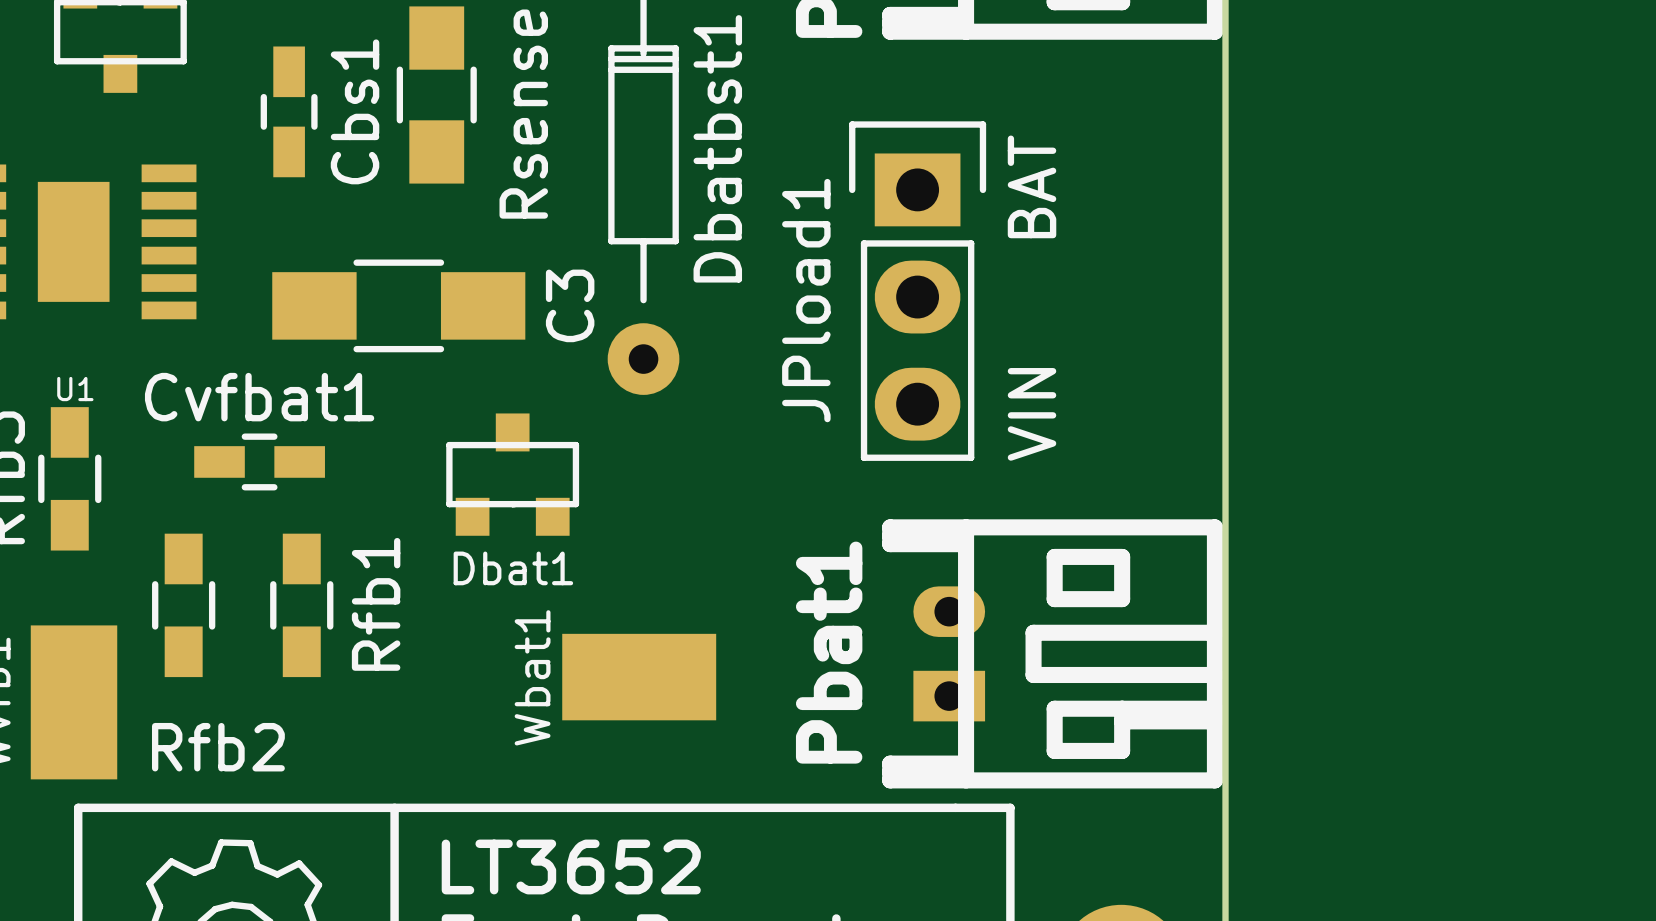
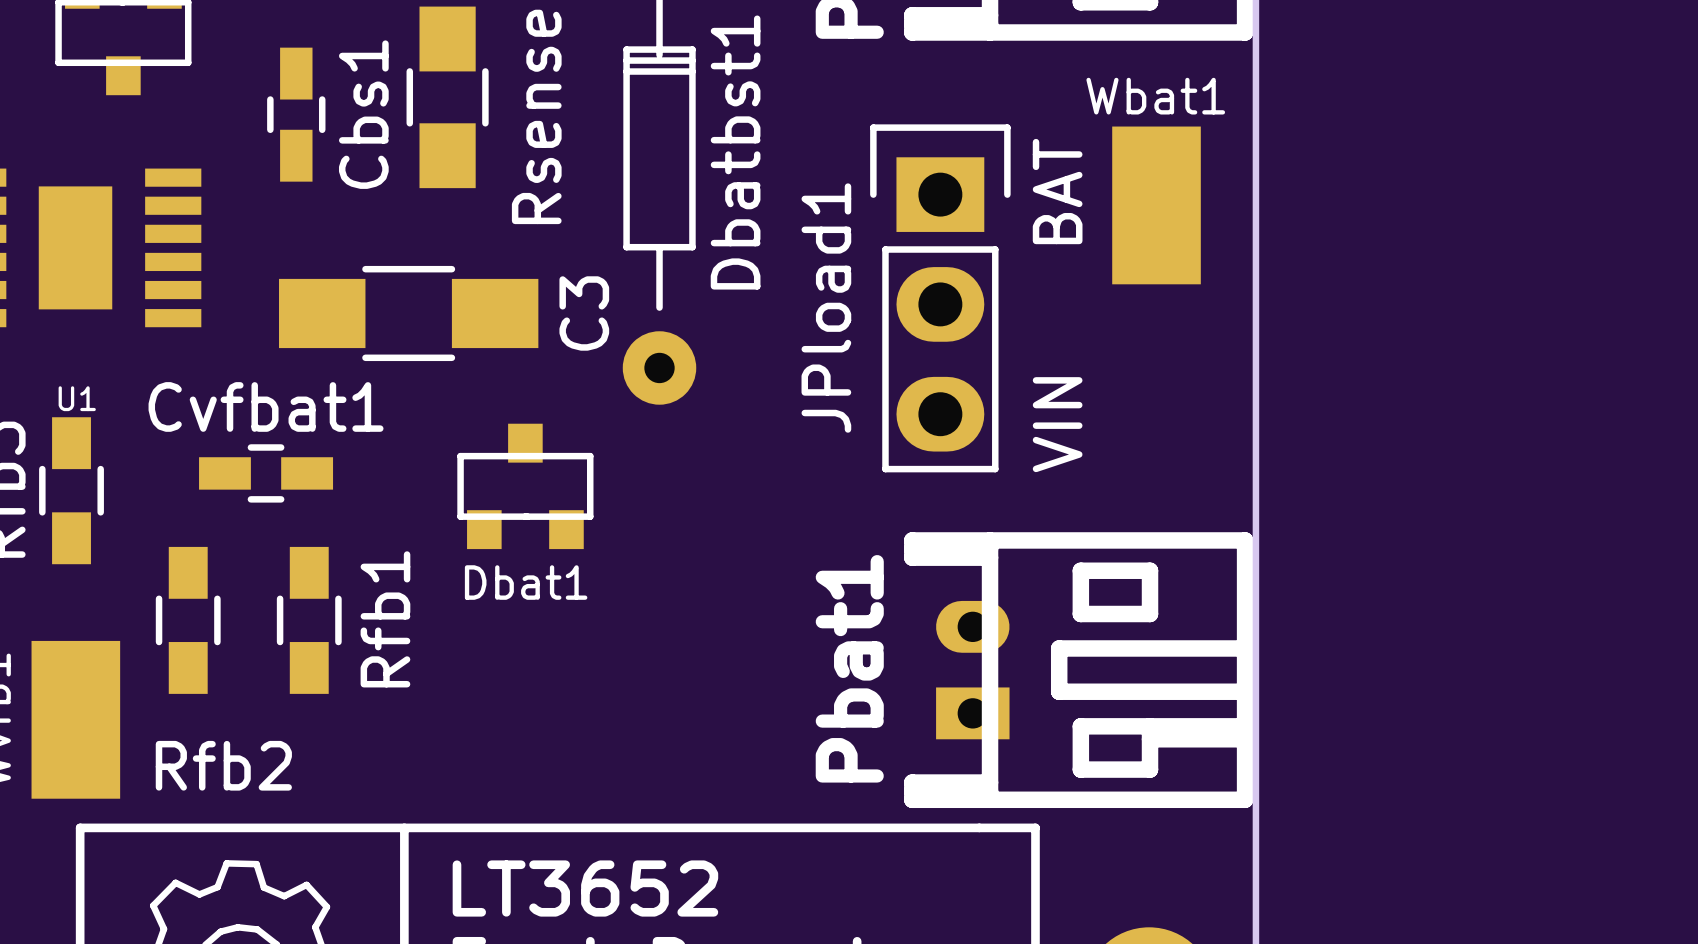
Wbat1 rotation: 0° (639, 677) -> 90° clockwise (1156, 205)
Wbat1 position: (639, 677) -> (1156, 205)

